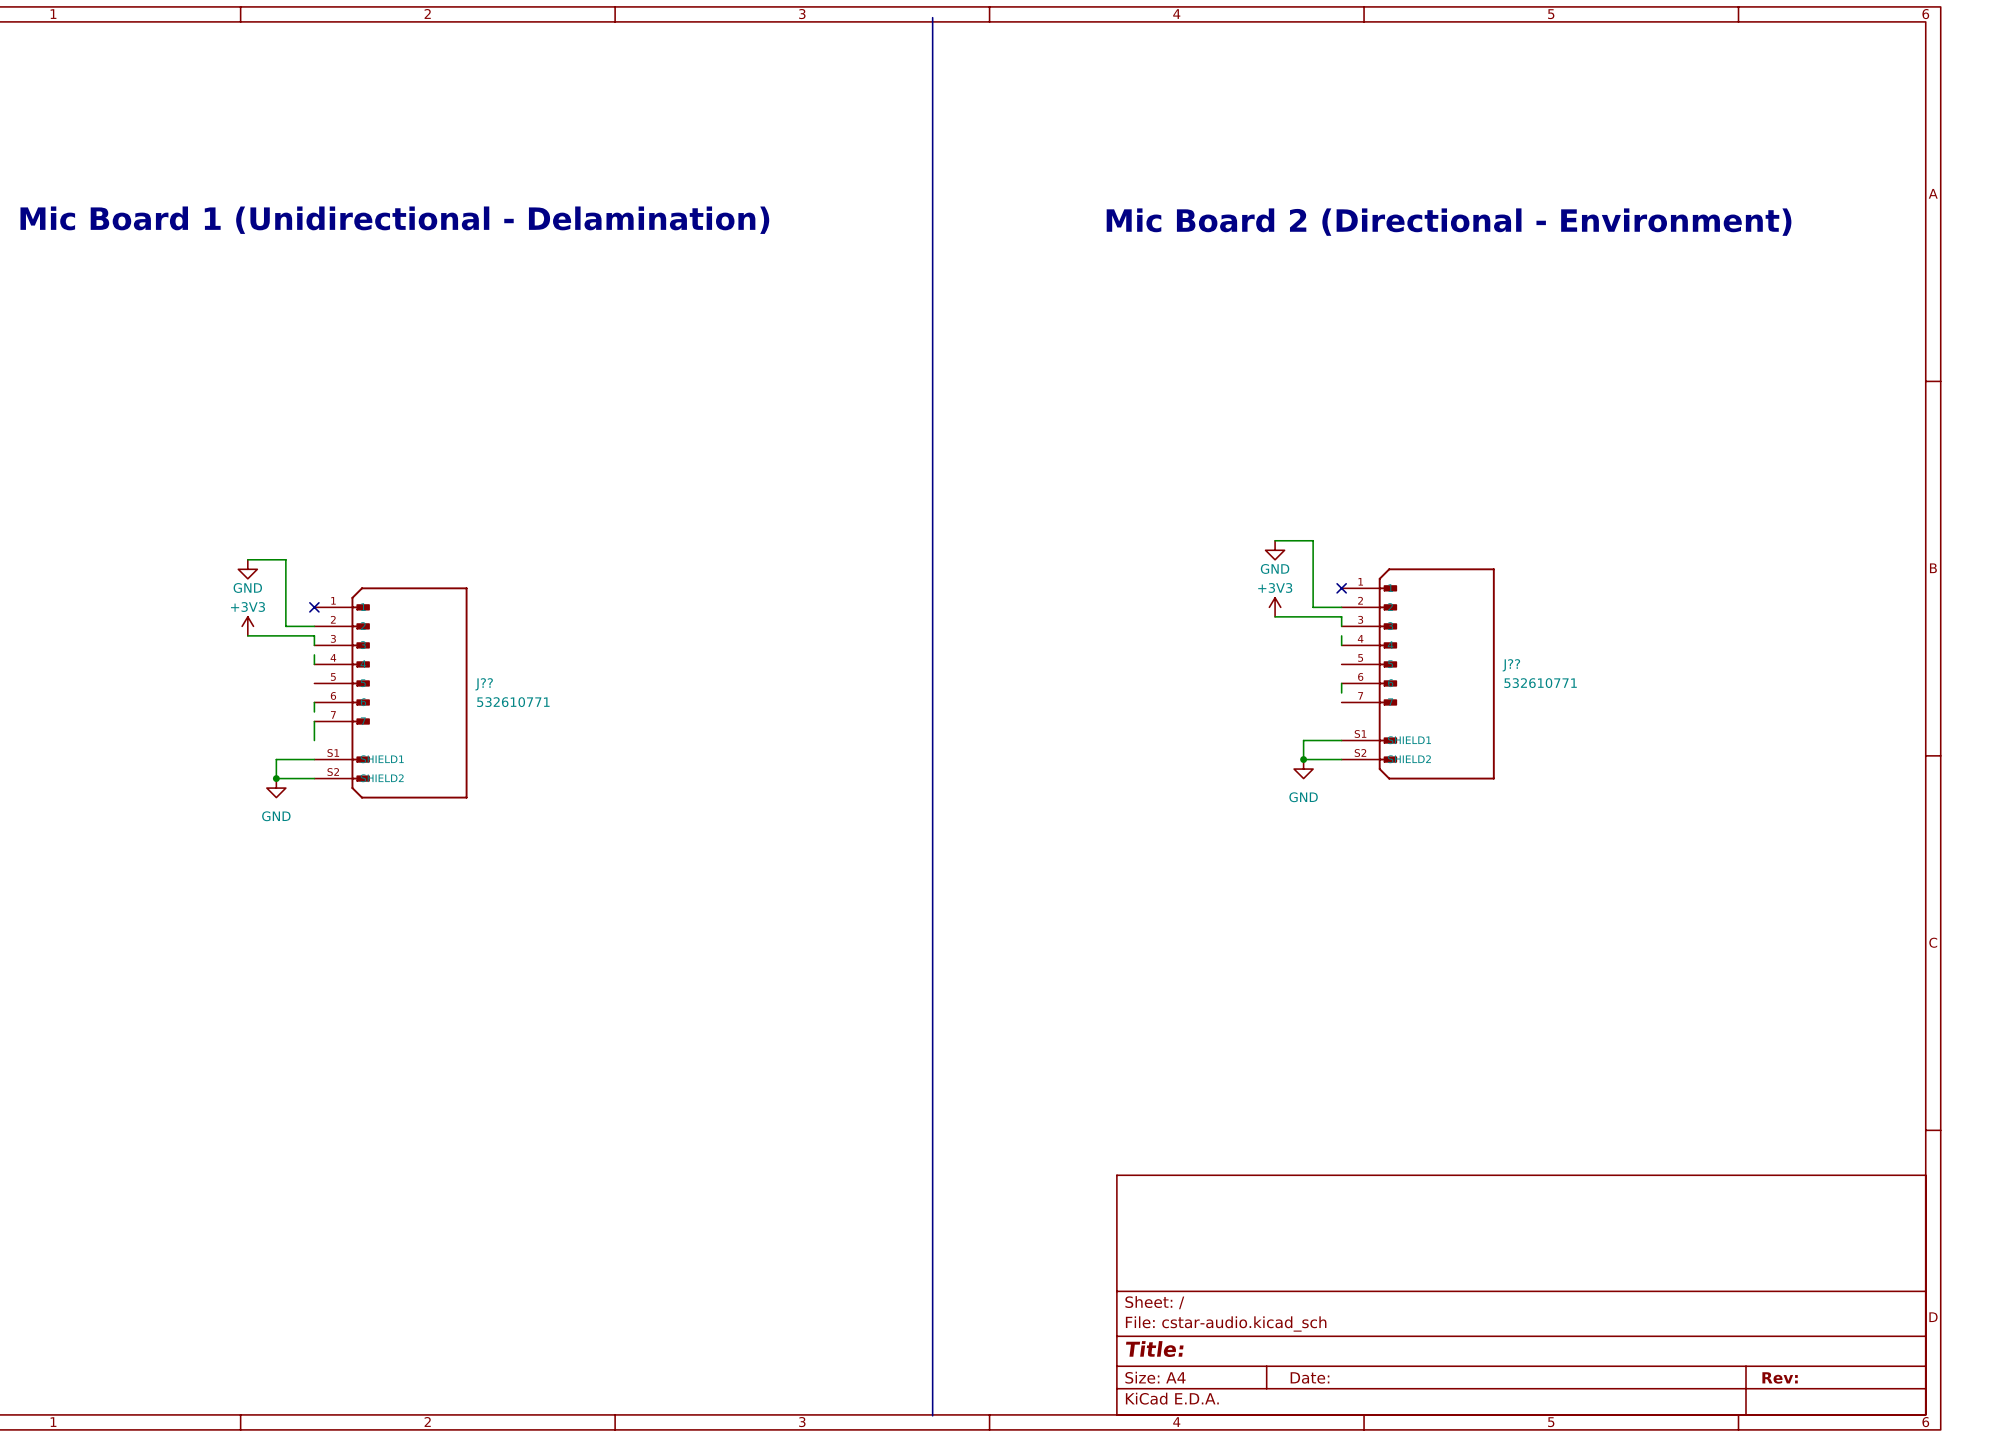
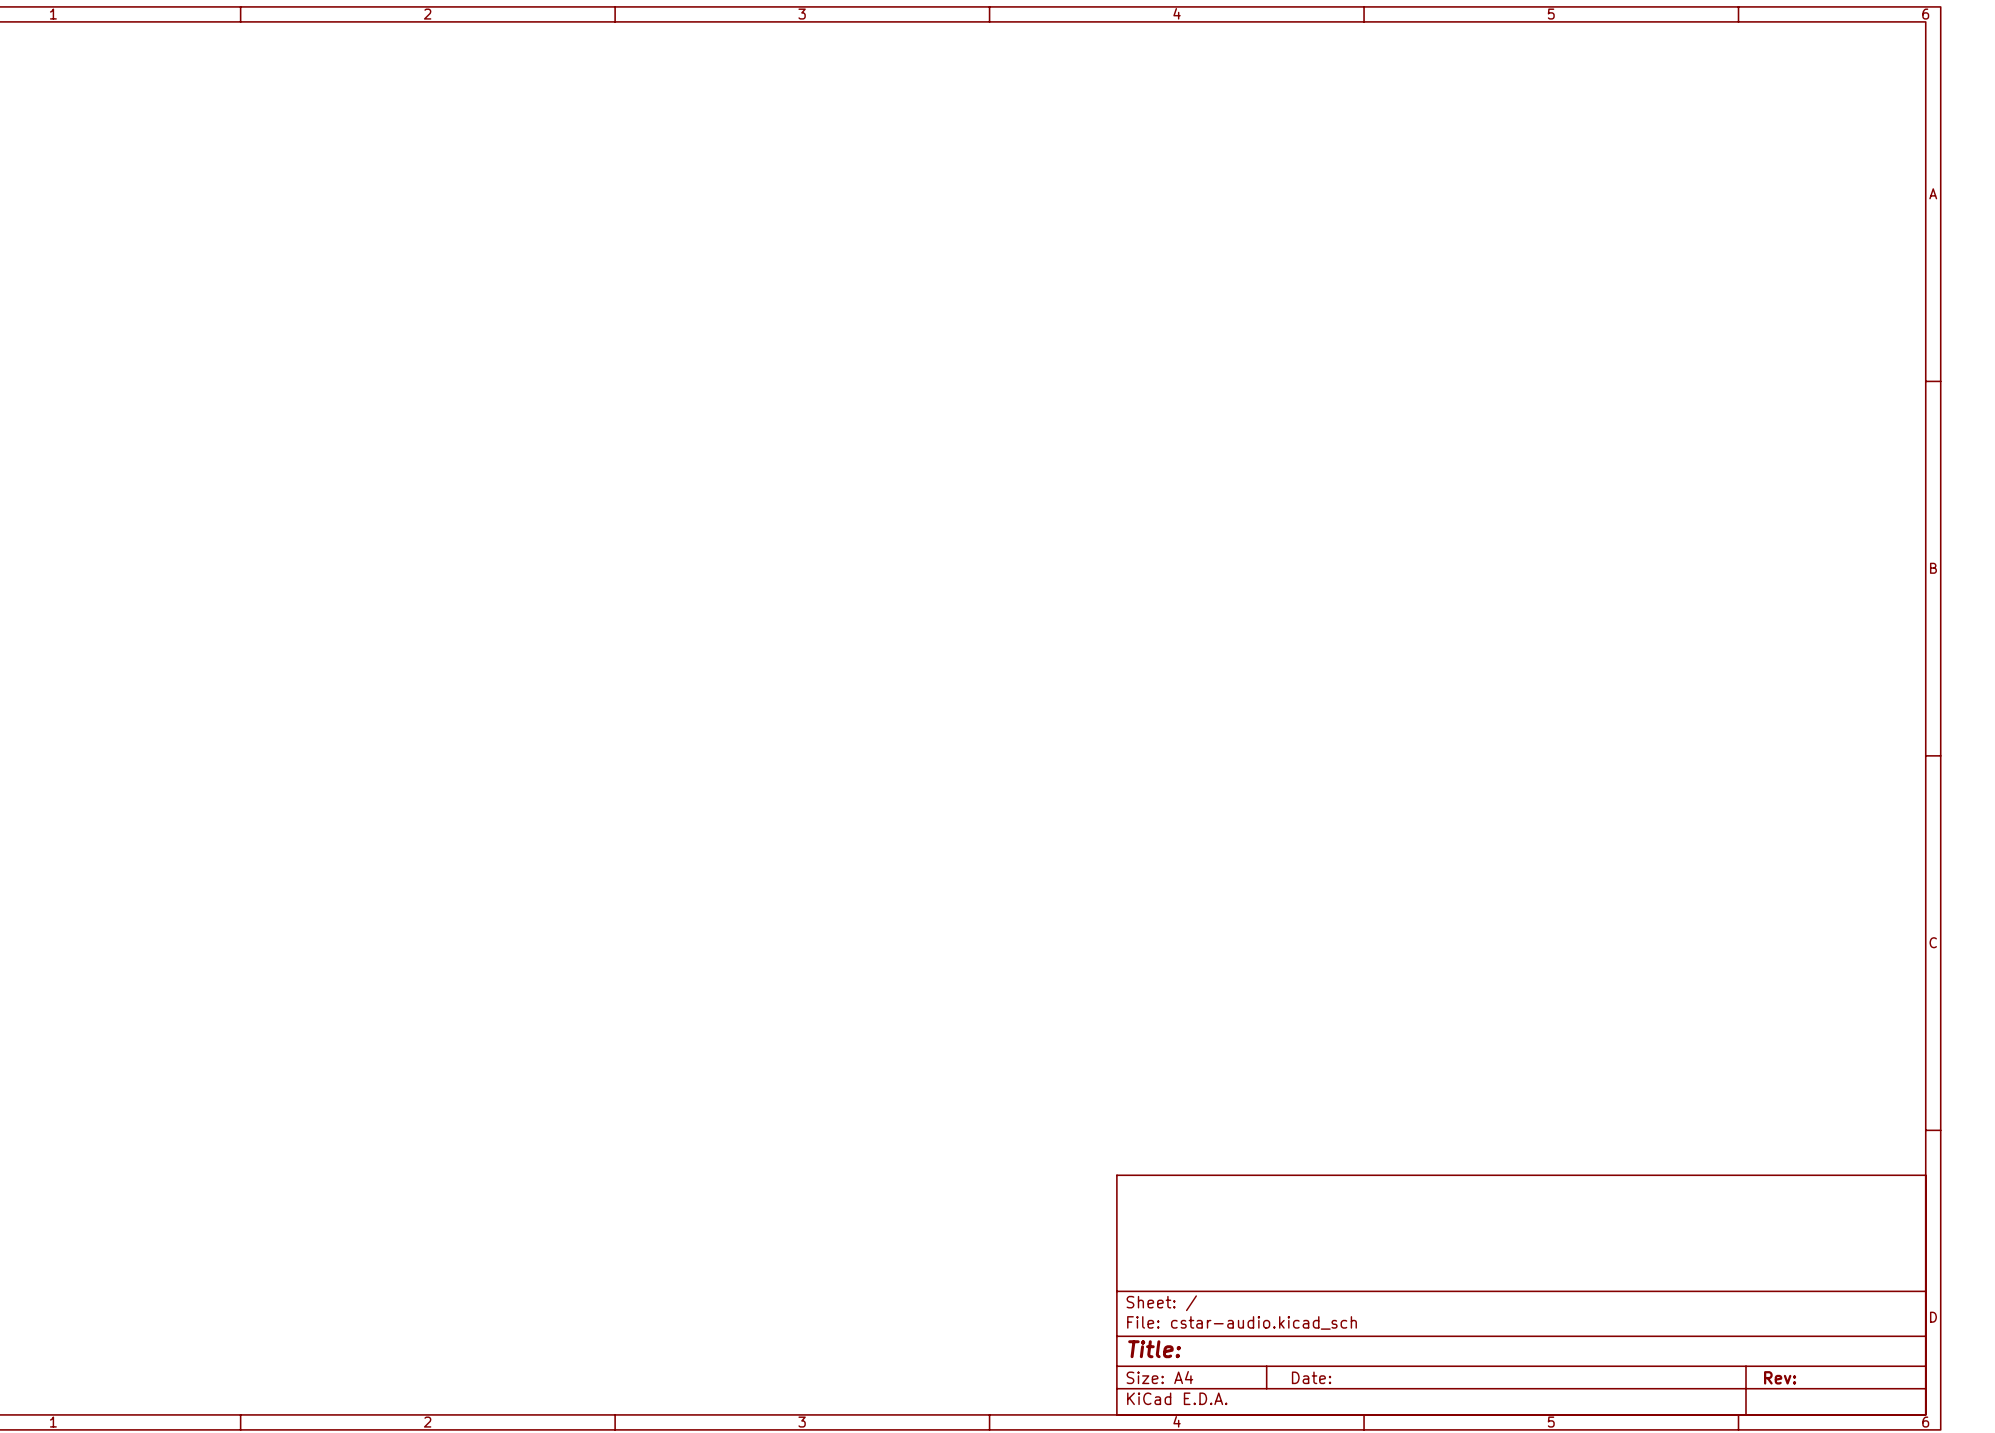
bus: (932, 17) (932, 1415) -> none
text: Mic Board 1 (Unidirectional - Delamination) (394, 220) -> none
text: Mic Board 2 (Directional - Environment) (1449, 222) -> none
wire: (1275, 540) (1313, 540) (1313, 607) (1341, 607) -> none
power symbol: GND (1275, 550) -> none
wire: (247, 559) (285, 559) (285, 626) (314, 626) -> none
power symbol: GND (247, 569) -> none
no-connect mark: (1341, 588) -> none
no-connect mark: (314, 607) -> none
power symbol: +3V3 (1275, 607) -> none
wire: (1275, 616) (1341, 616) (1341, 626) -> none
power symbol: +3V3 (247, 626) -> none
wire: (247, 635) (314, 635) (314, 645) -> none
wire: (1341, 635) (1341, 645) -> none
wire: (314, 654) (314, 664) -> none
J??: 532610771 (1418, 673) -> none
wire: (1341, 683) (1341, 692) -> none
J??: 532610771 (390, 692) -> none
wire: (314, 702) (314, 711) -> none
wire: (314, 721) (314, 740) -> none
wire: (1341, 740) (1303, 740) (1303, 759) (1341, 759) -> none
wire: (314, 759) (276, 759) (276, 778) (314, 778) -> none
junction: (1303, 759) -> none
power symbol: GND (1303, 769) -> none
junction: (276, 778) -> none
power symbol: GND (276, 788) -> none

